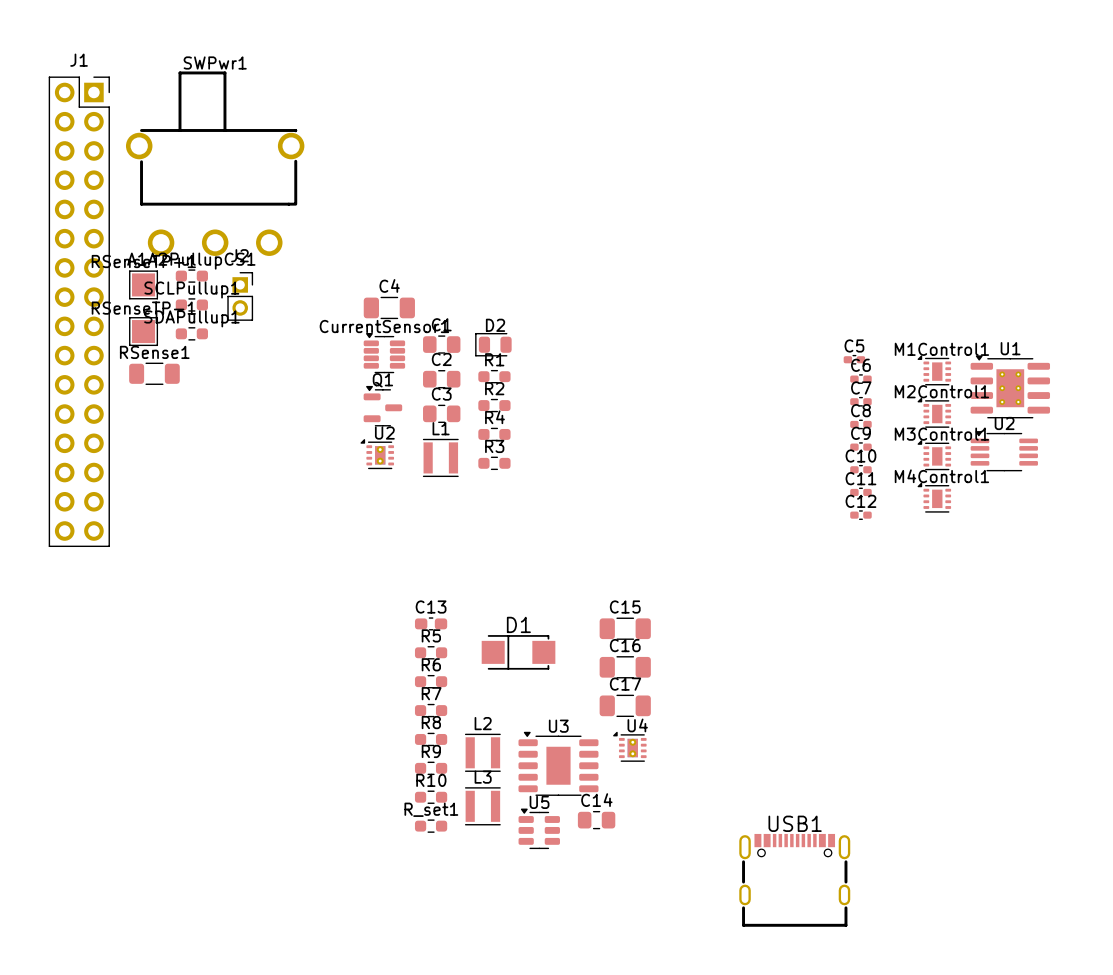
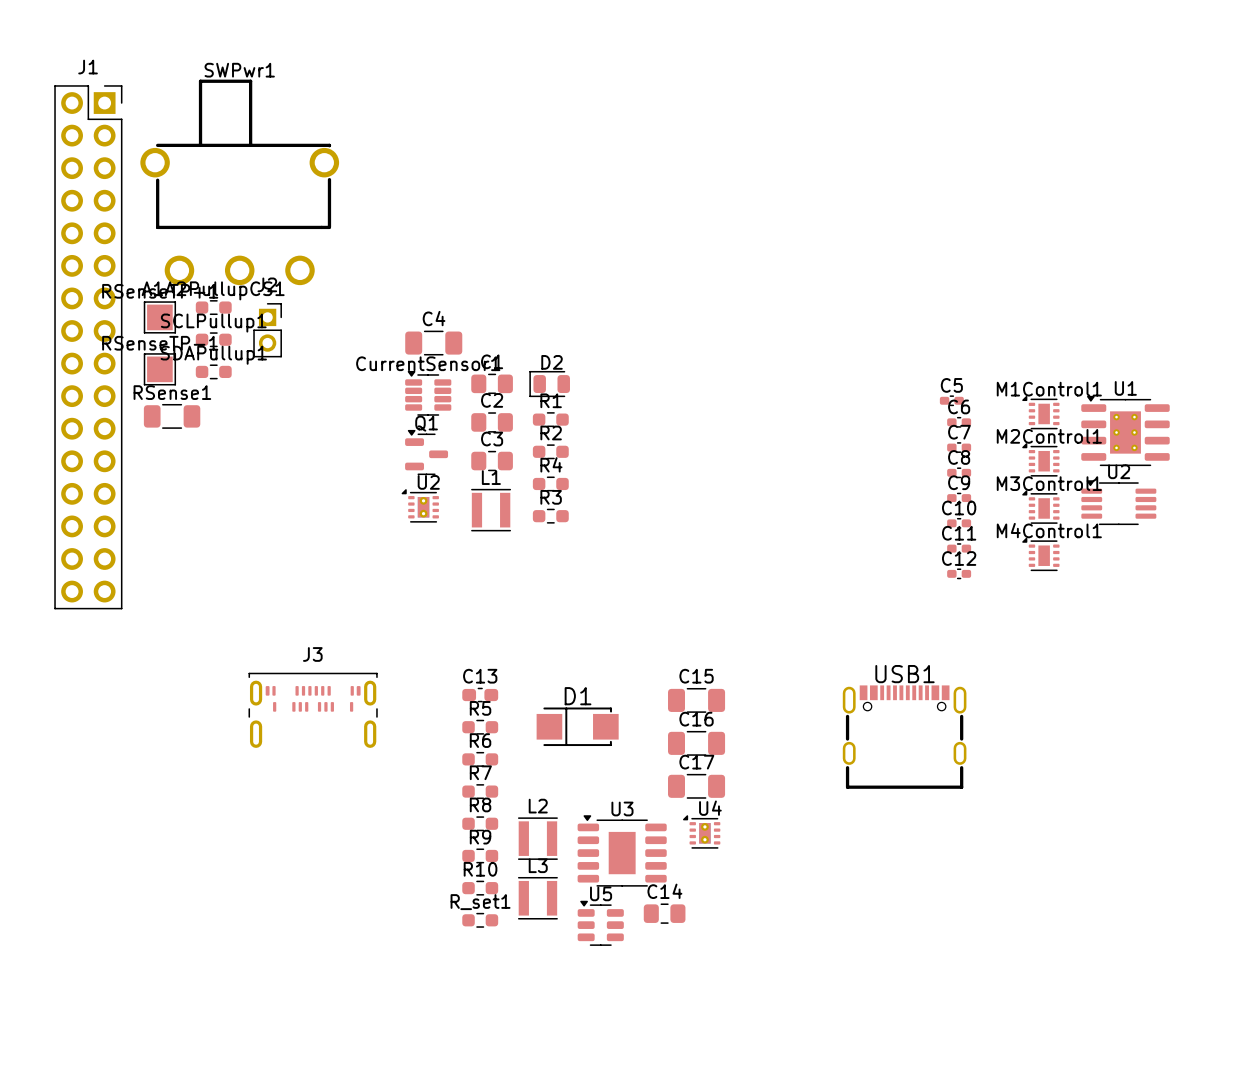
J3: none -> (313, 710)
USB1 position: (794, 880) -> (904, 737)

